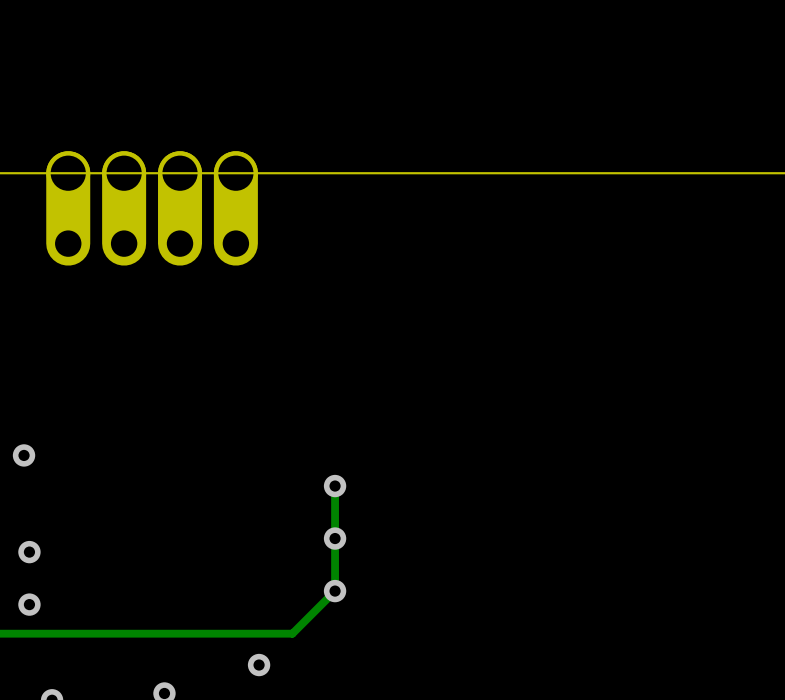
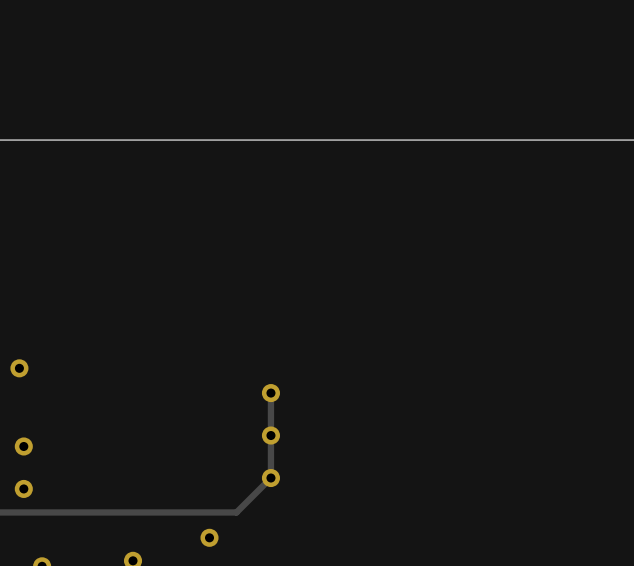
part: (68, 208) -> none
part: (124, 208) -> none
part: (180, 208) -> none
part: (235, 208) -> none

